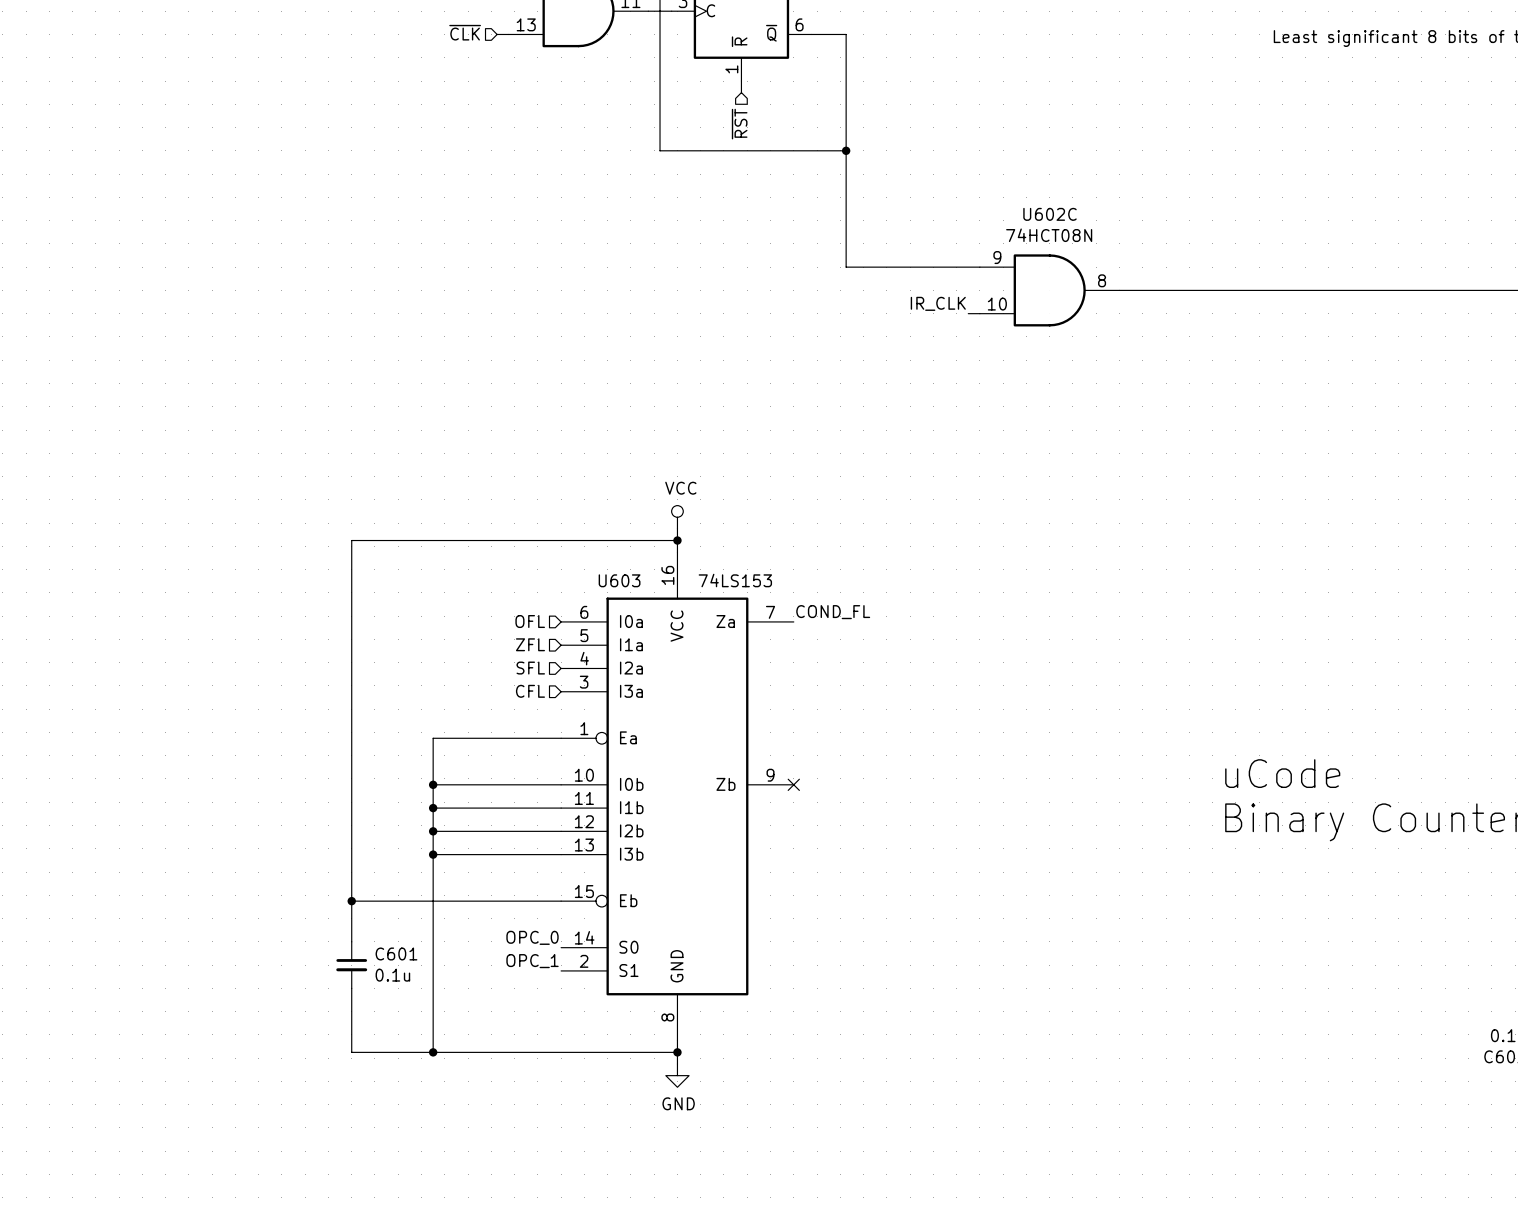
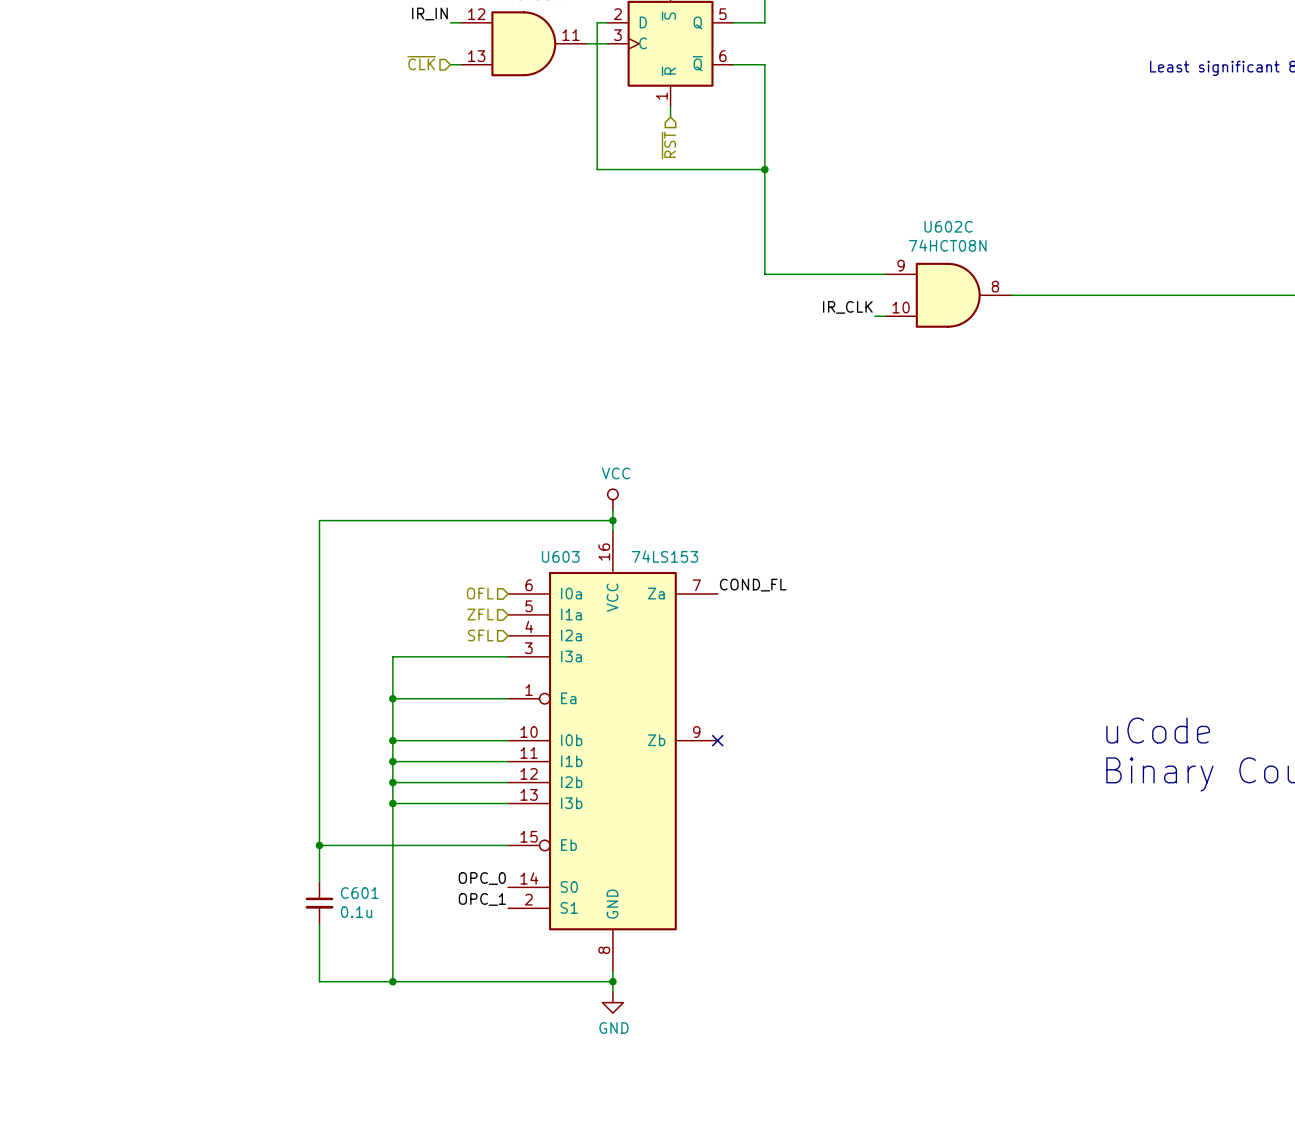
hierarchical label: CFL (530, 691) -> none
wire: none -> (508, 656) (392, 656) (392, 698)
junction: none -> (392, 698)

